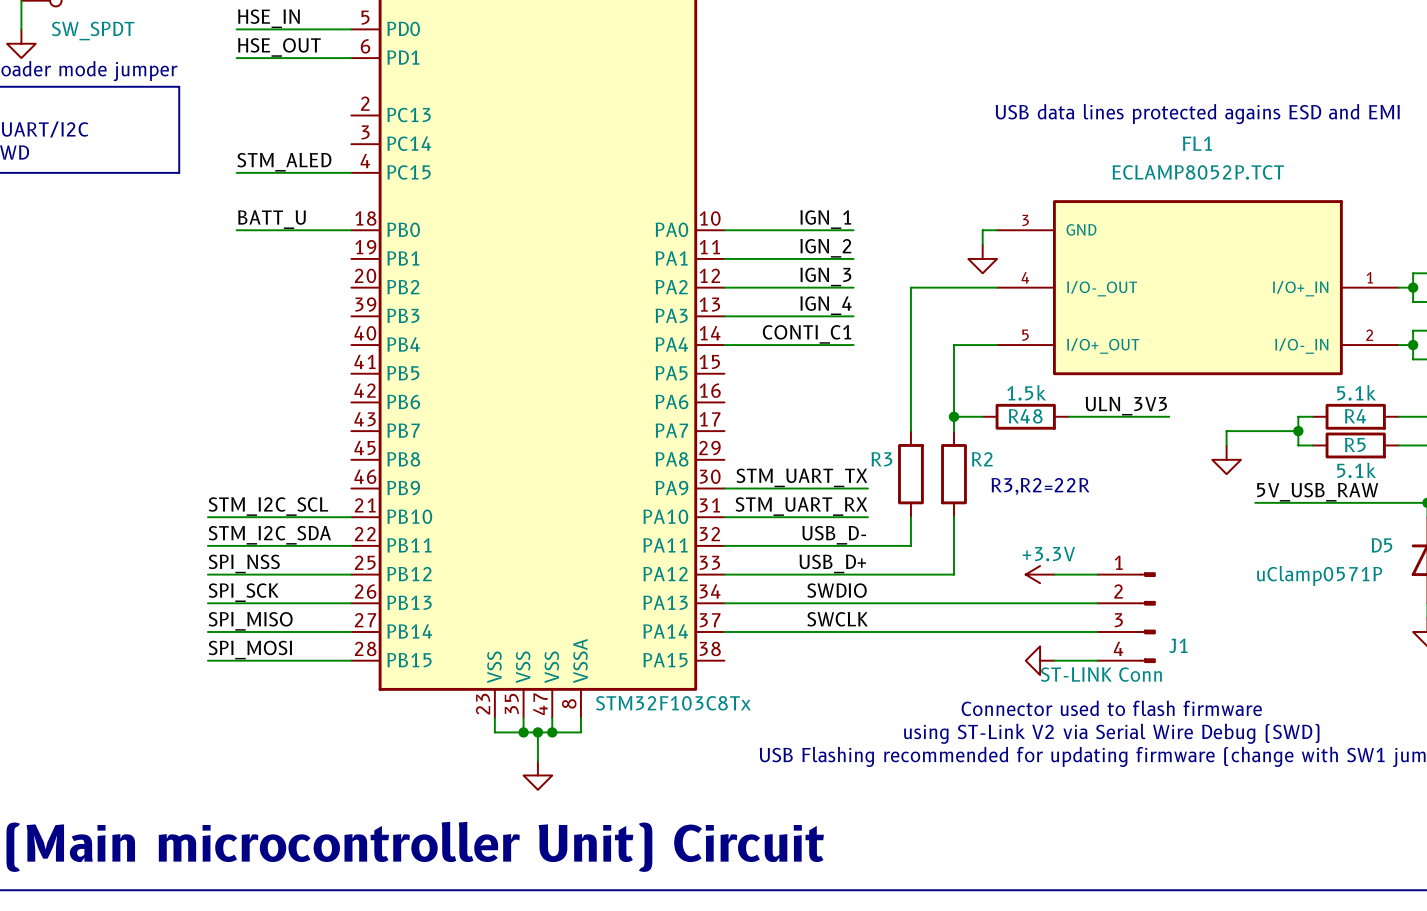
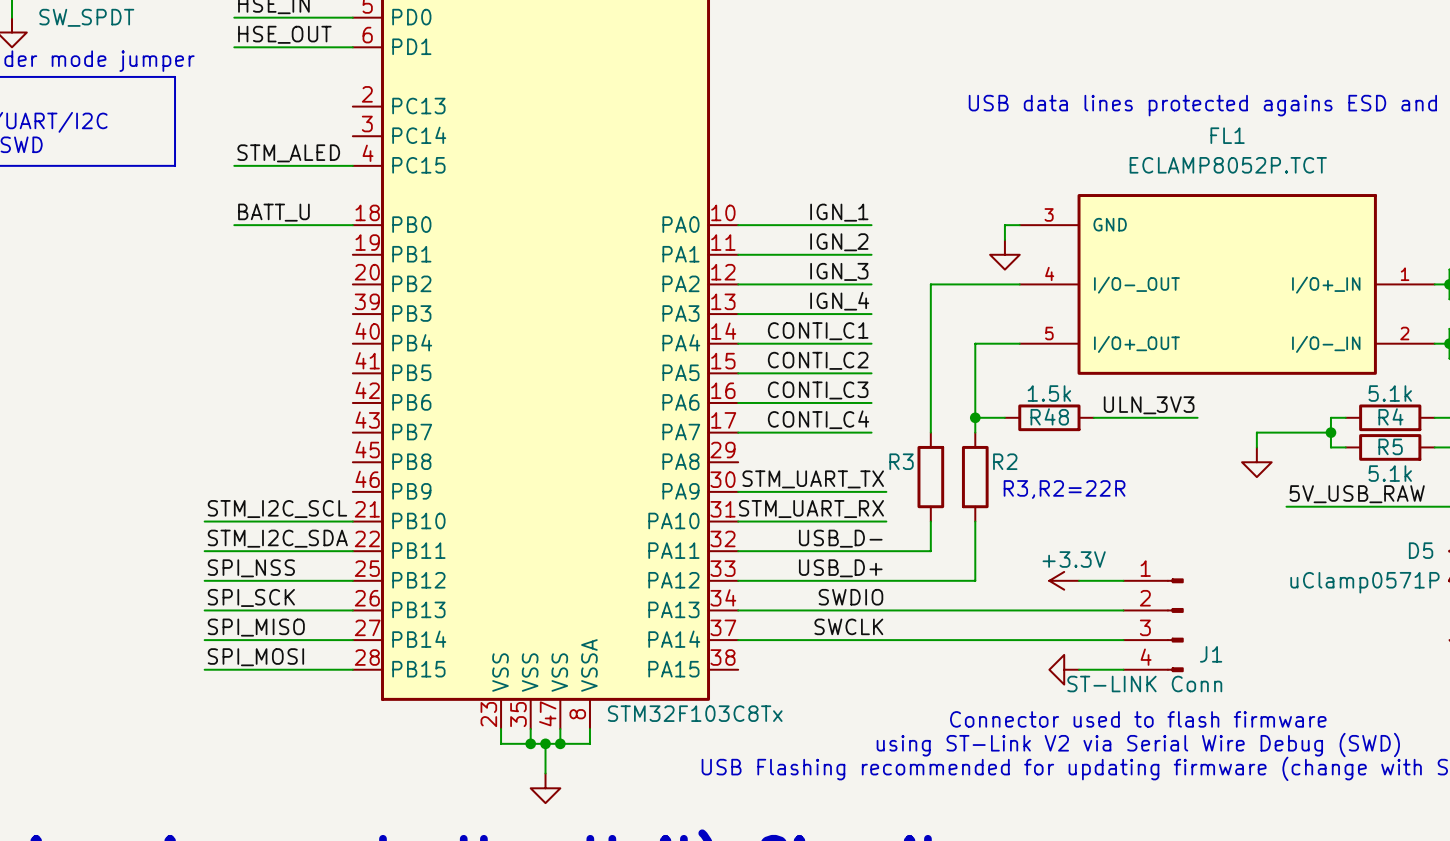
label: none -> CONTI_C2 (818, 360)
wire: none -> (738, 373) (871, 373)
label: none -> CONTI_C3 (818, 390)
wire: none -> (738, 402) (871, 402)
label: none -> CONTI_C4 (818, 419)
wire: none -> (738, 432) (871, 432)

